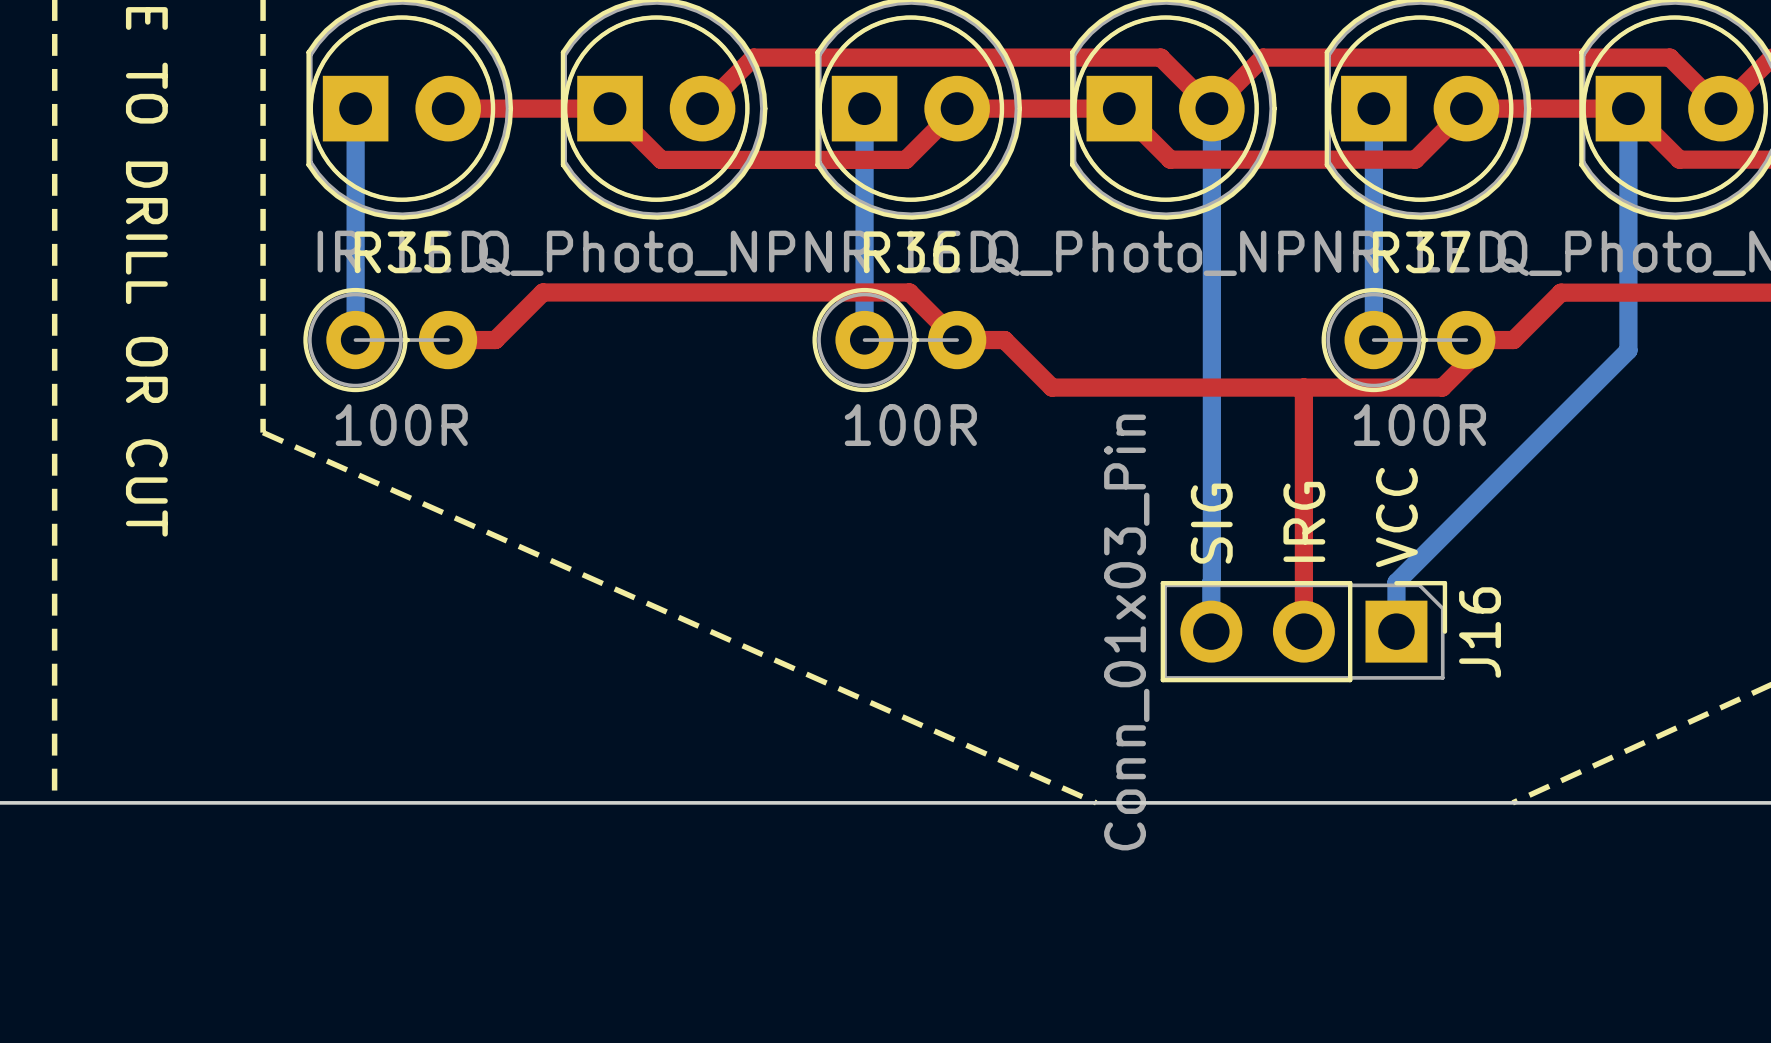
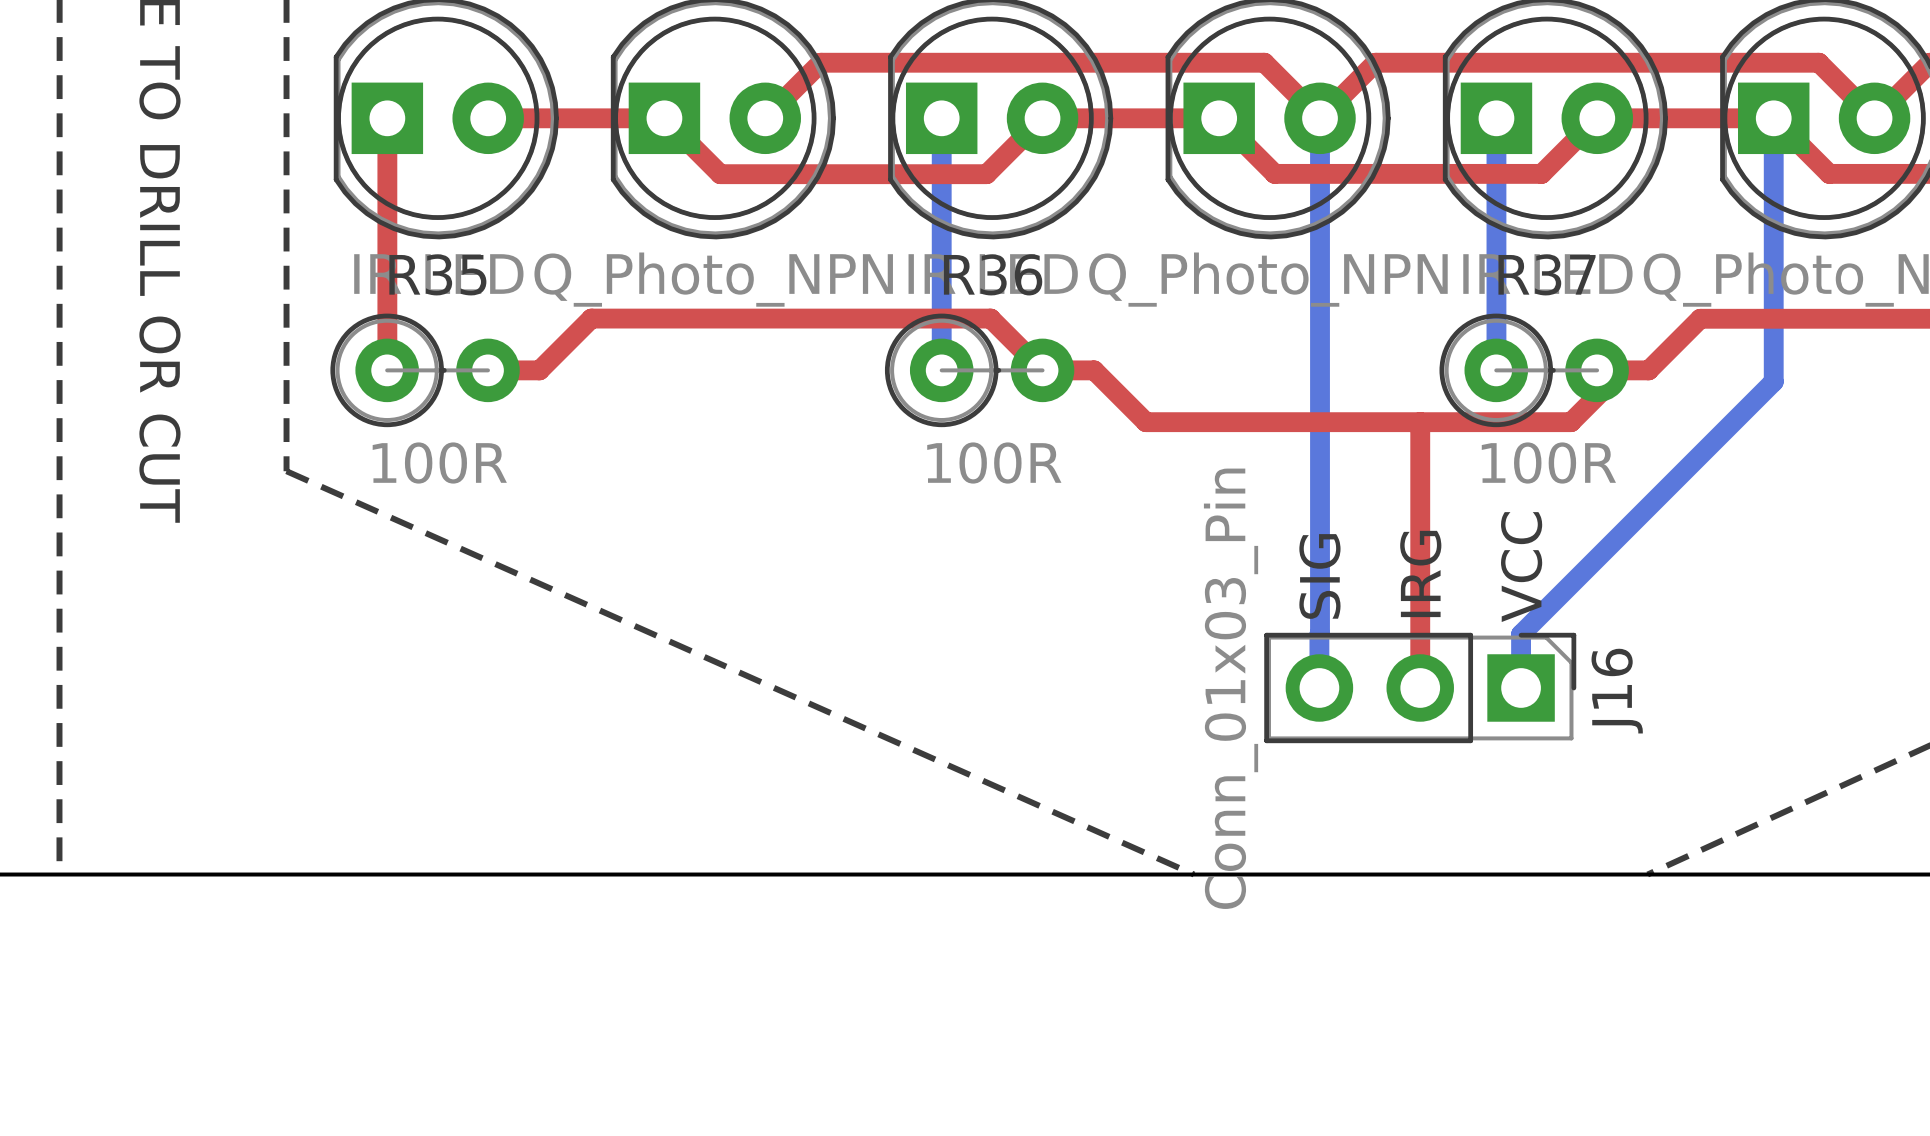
bottom track: (355, 108) (355, 339) -> none
top track: none -> (387, 118) (387, 370)

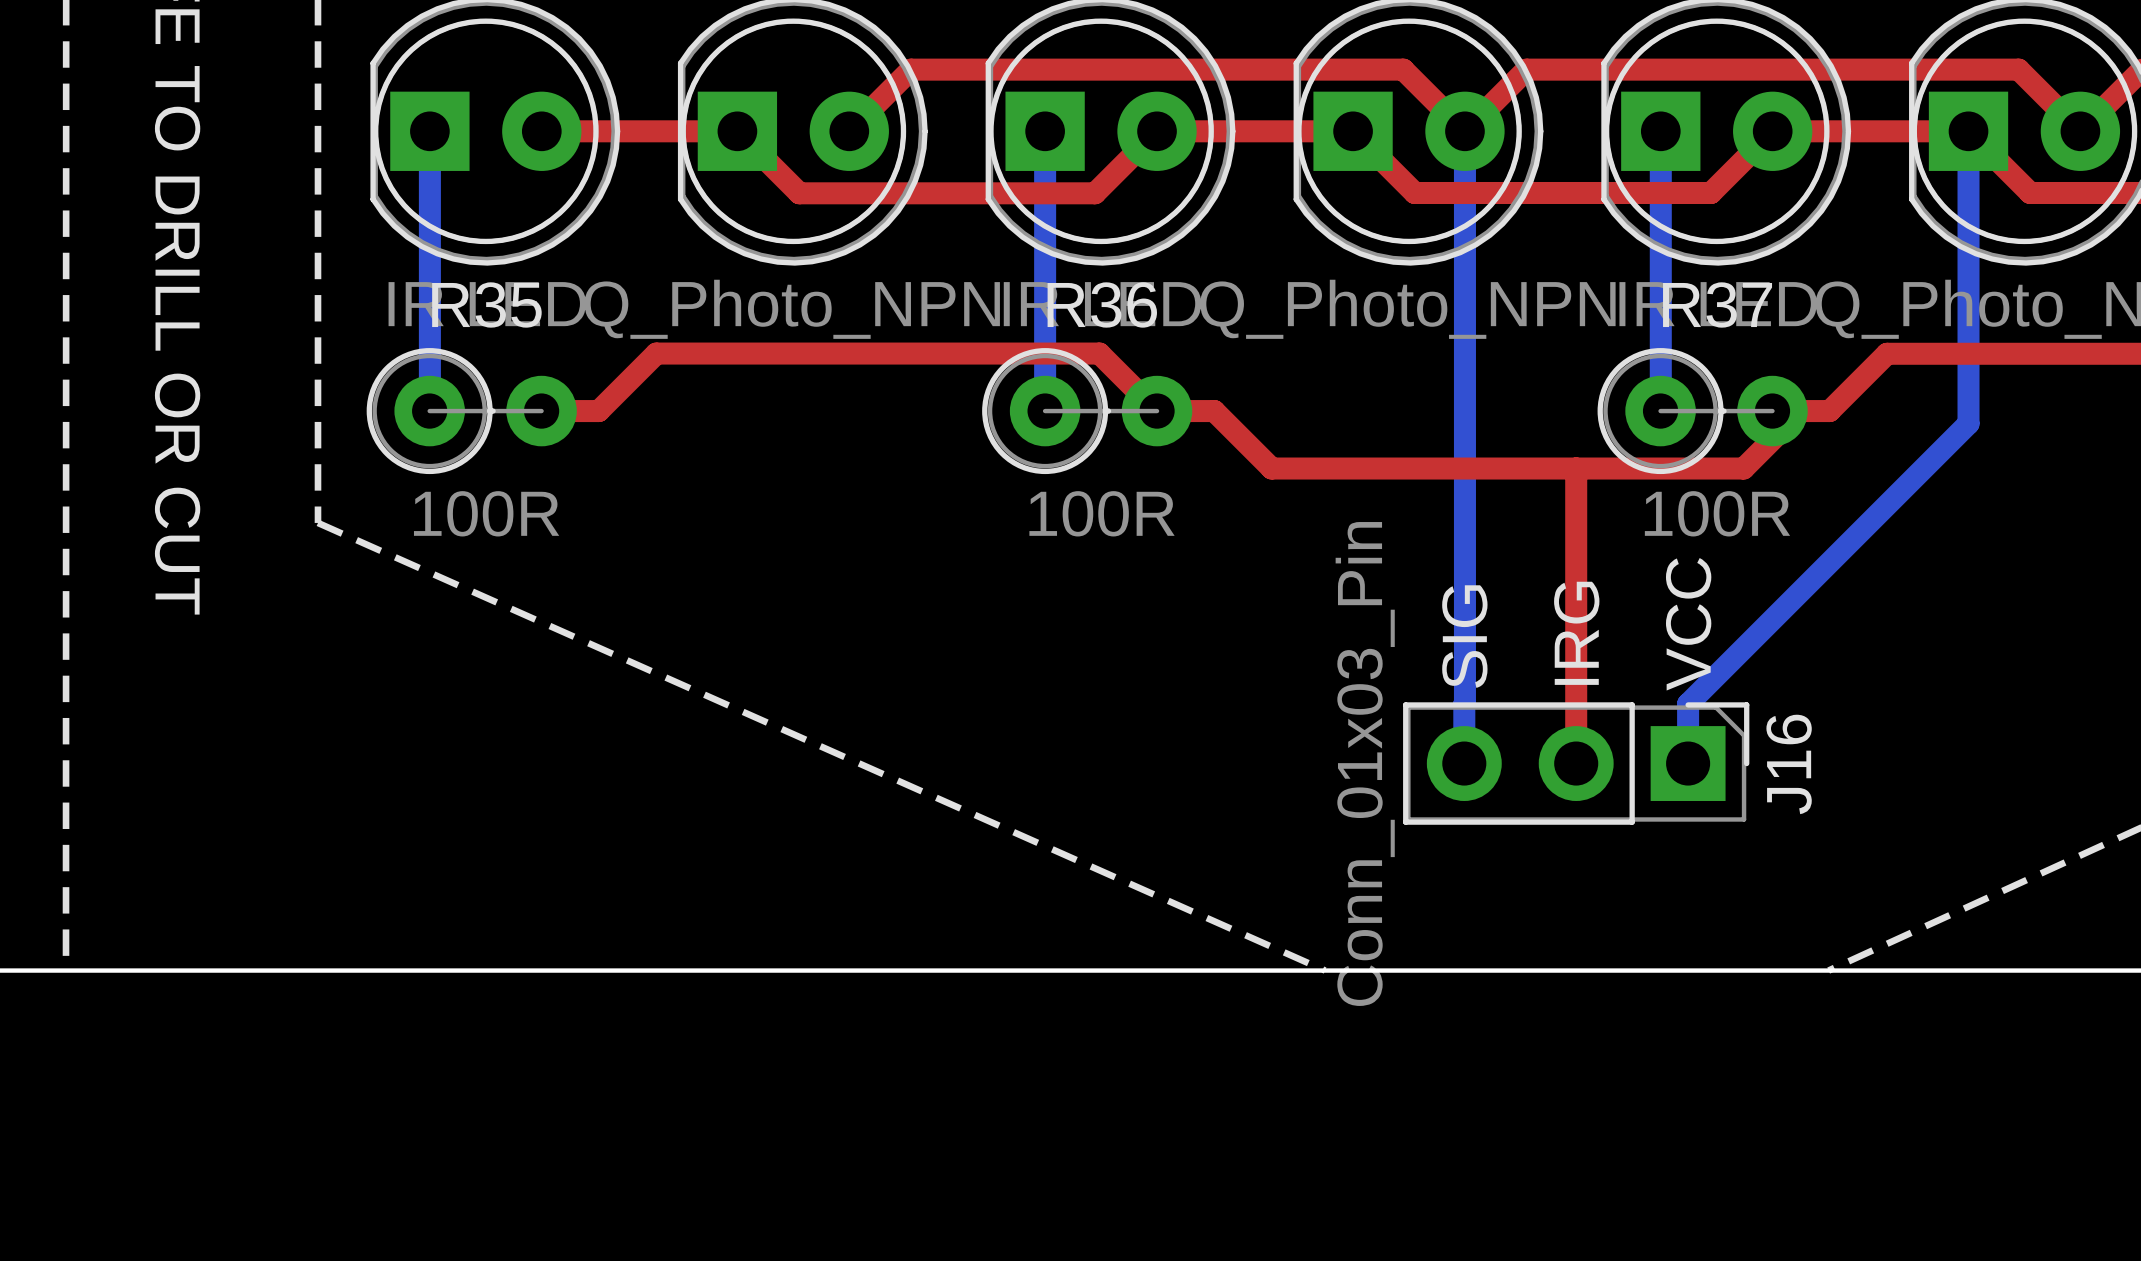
top track: (387, 118) (387, 370) -> none
bottom track: none -> (429, 131) (429, 410)

